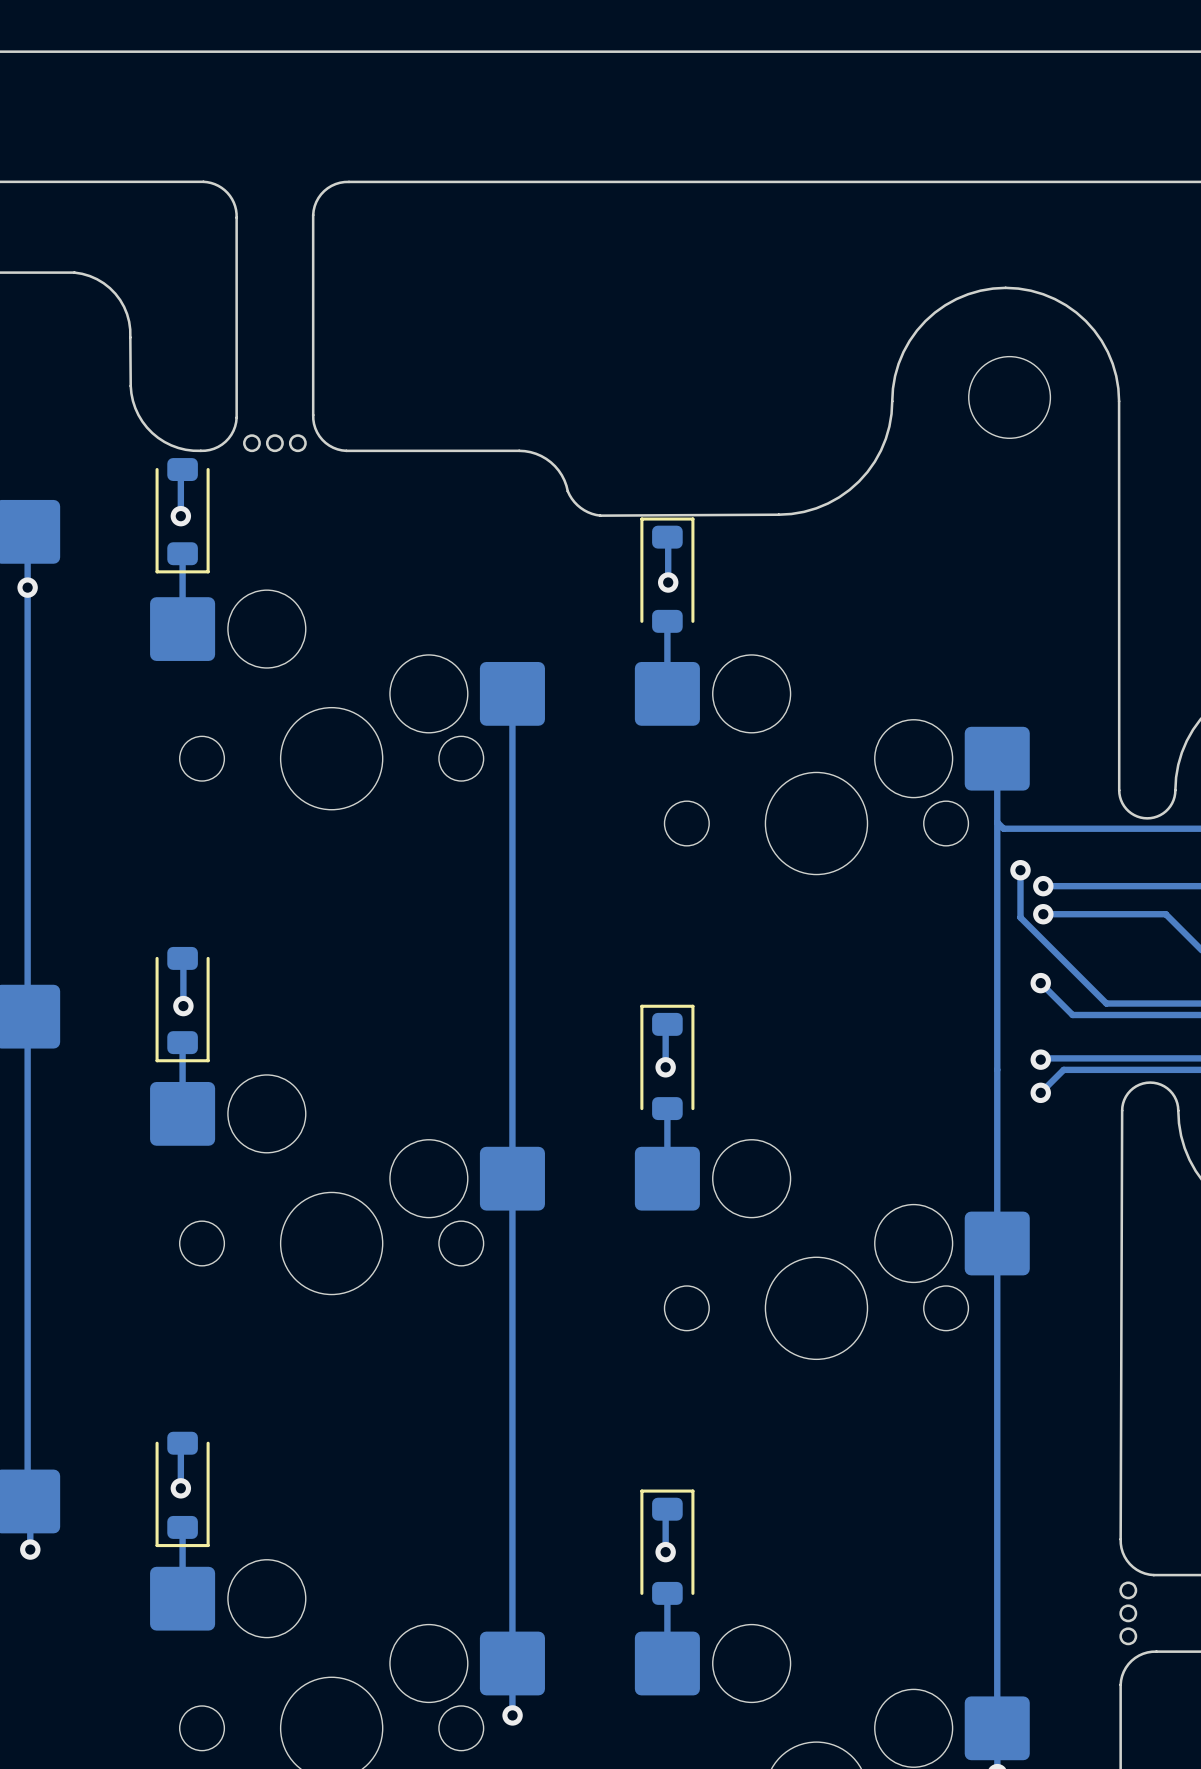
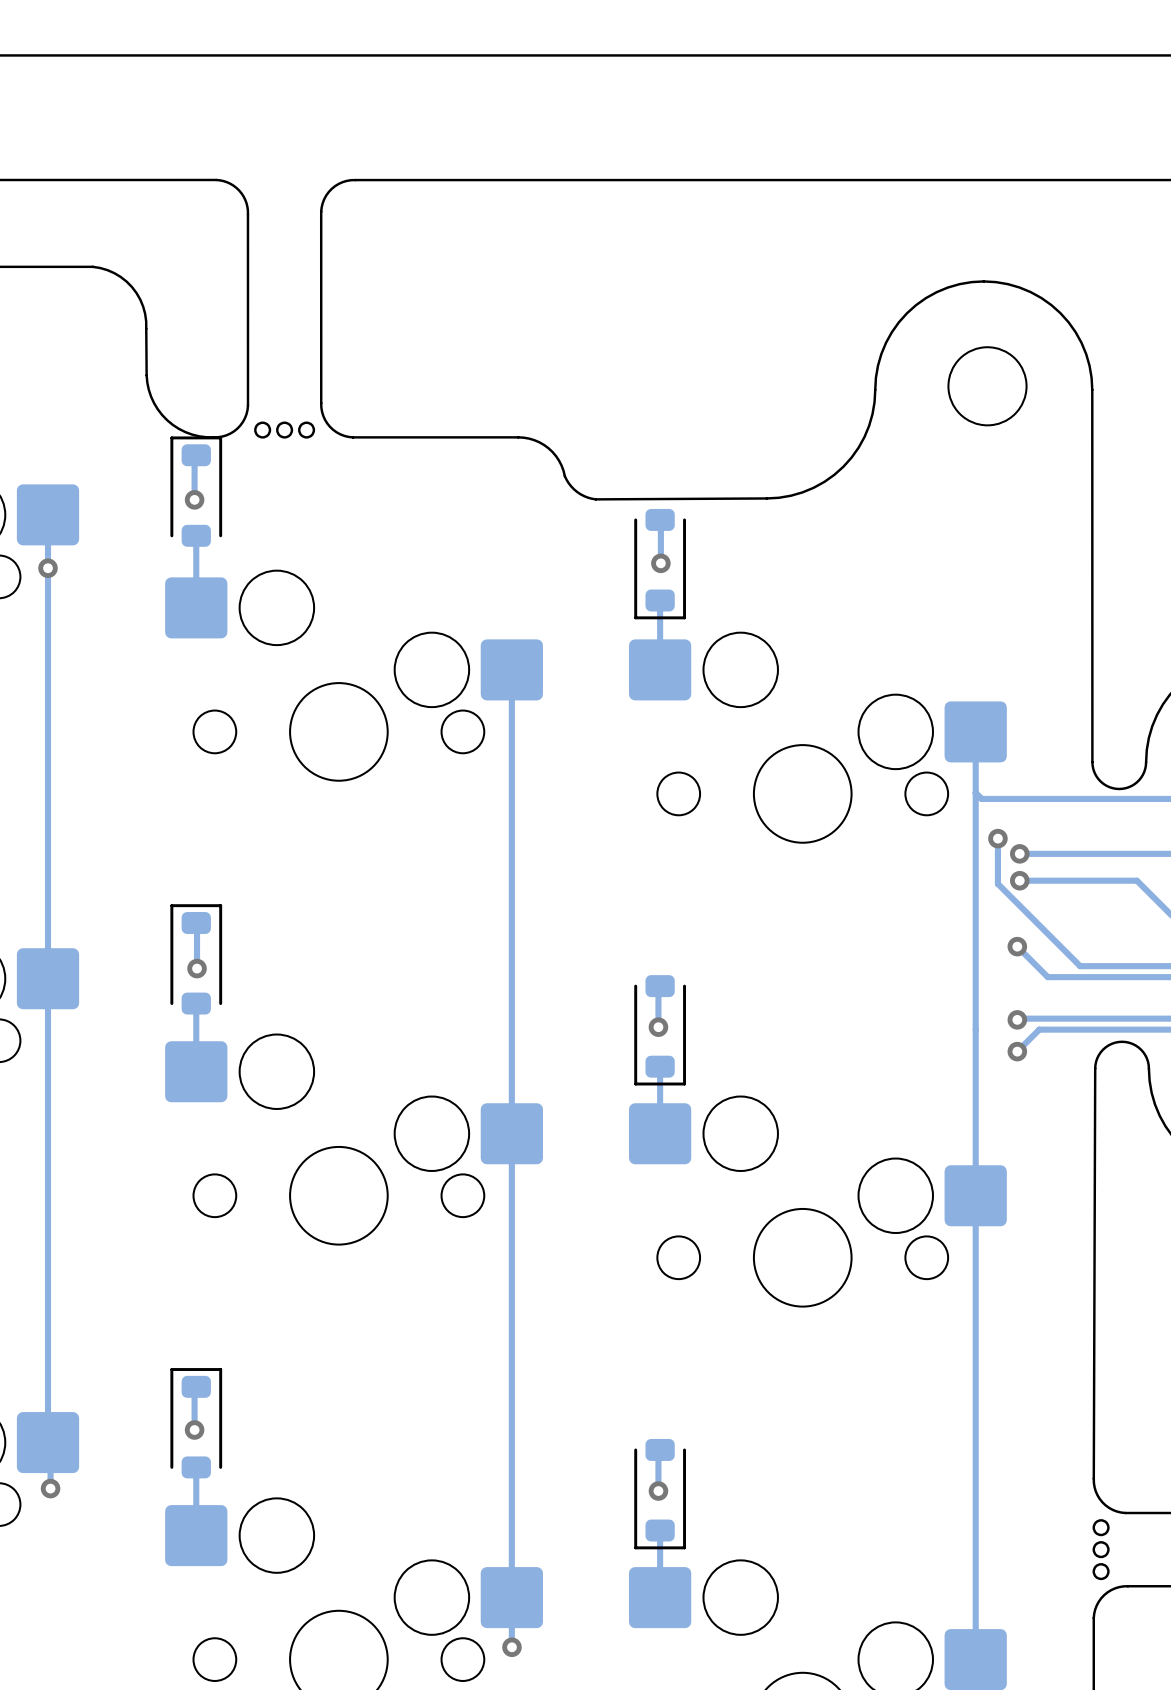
part rotation: 0° (182, 515) -> 180° (196, 491)
part rotation: 0° (667, 575) -> 180° (660, 564)
part rotation: 0° (182, 1004) -> 180° (196, 959)
part rotation: 0° (667, 1062) -> 180° (660, 1030)
part rotation: 0° (182, 1489) -> 180° (196, 1423)
part rotation: 0° (667, 1547) -> 180° (660, 1494)

